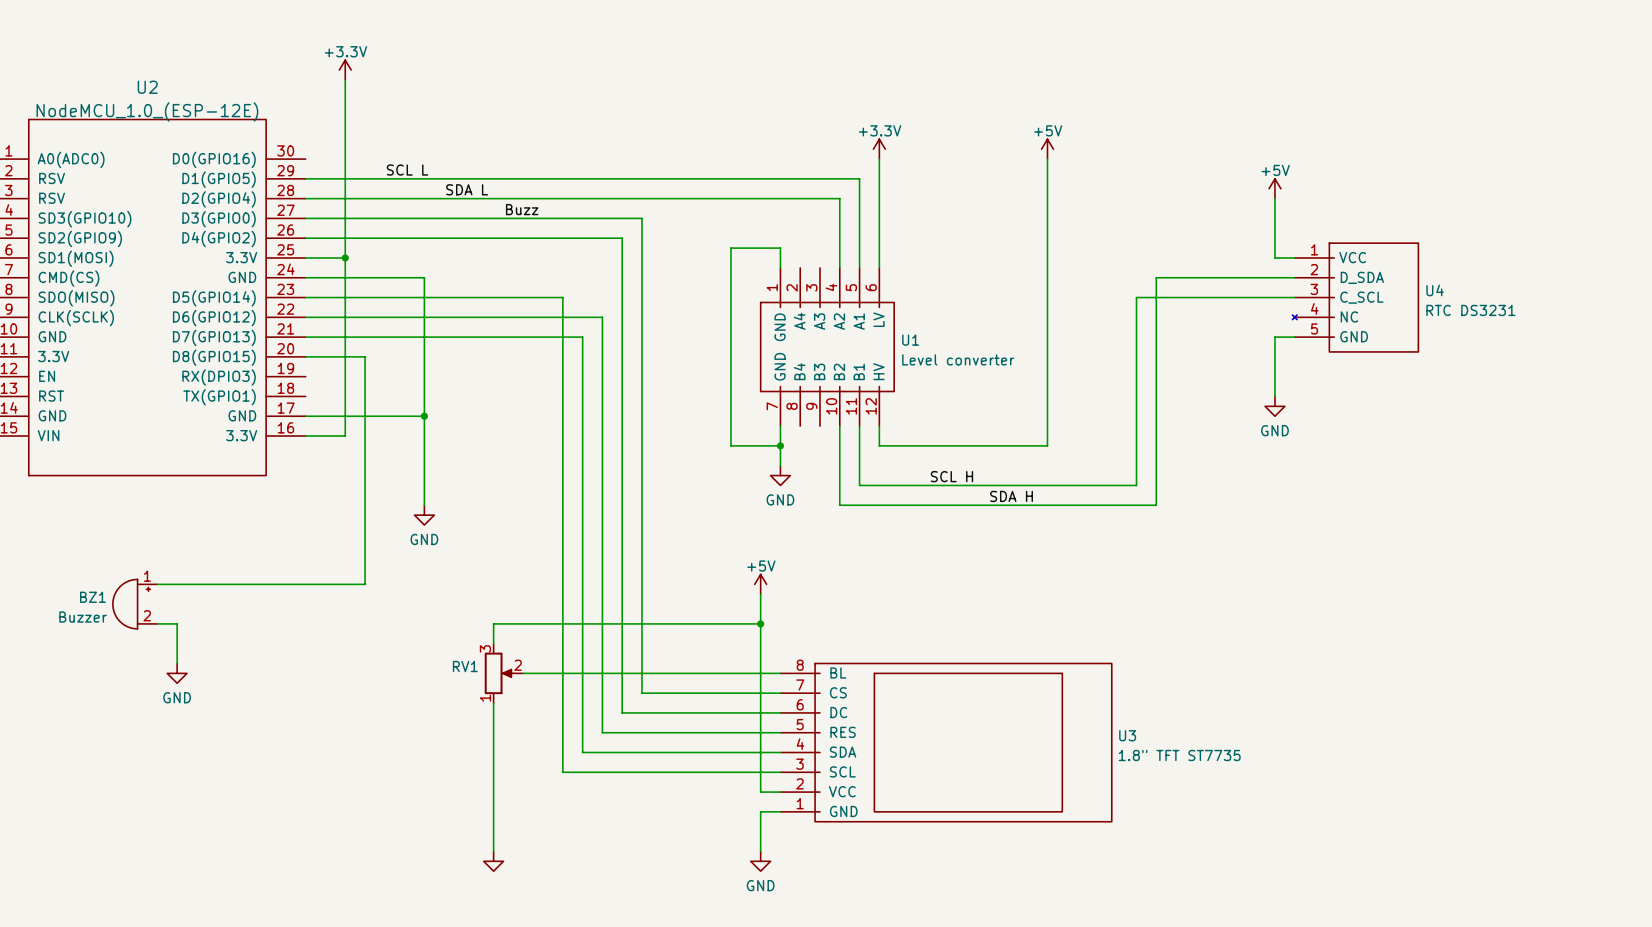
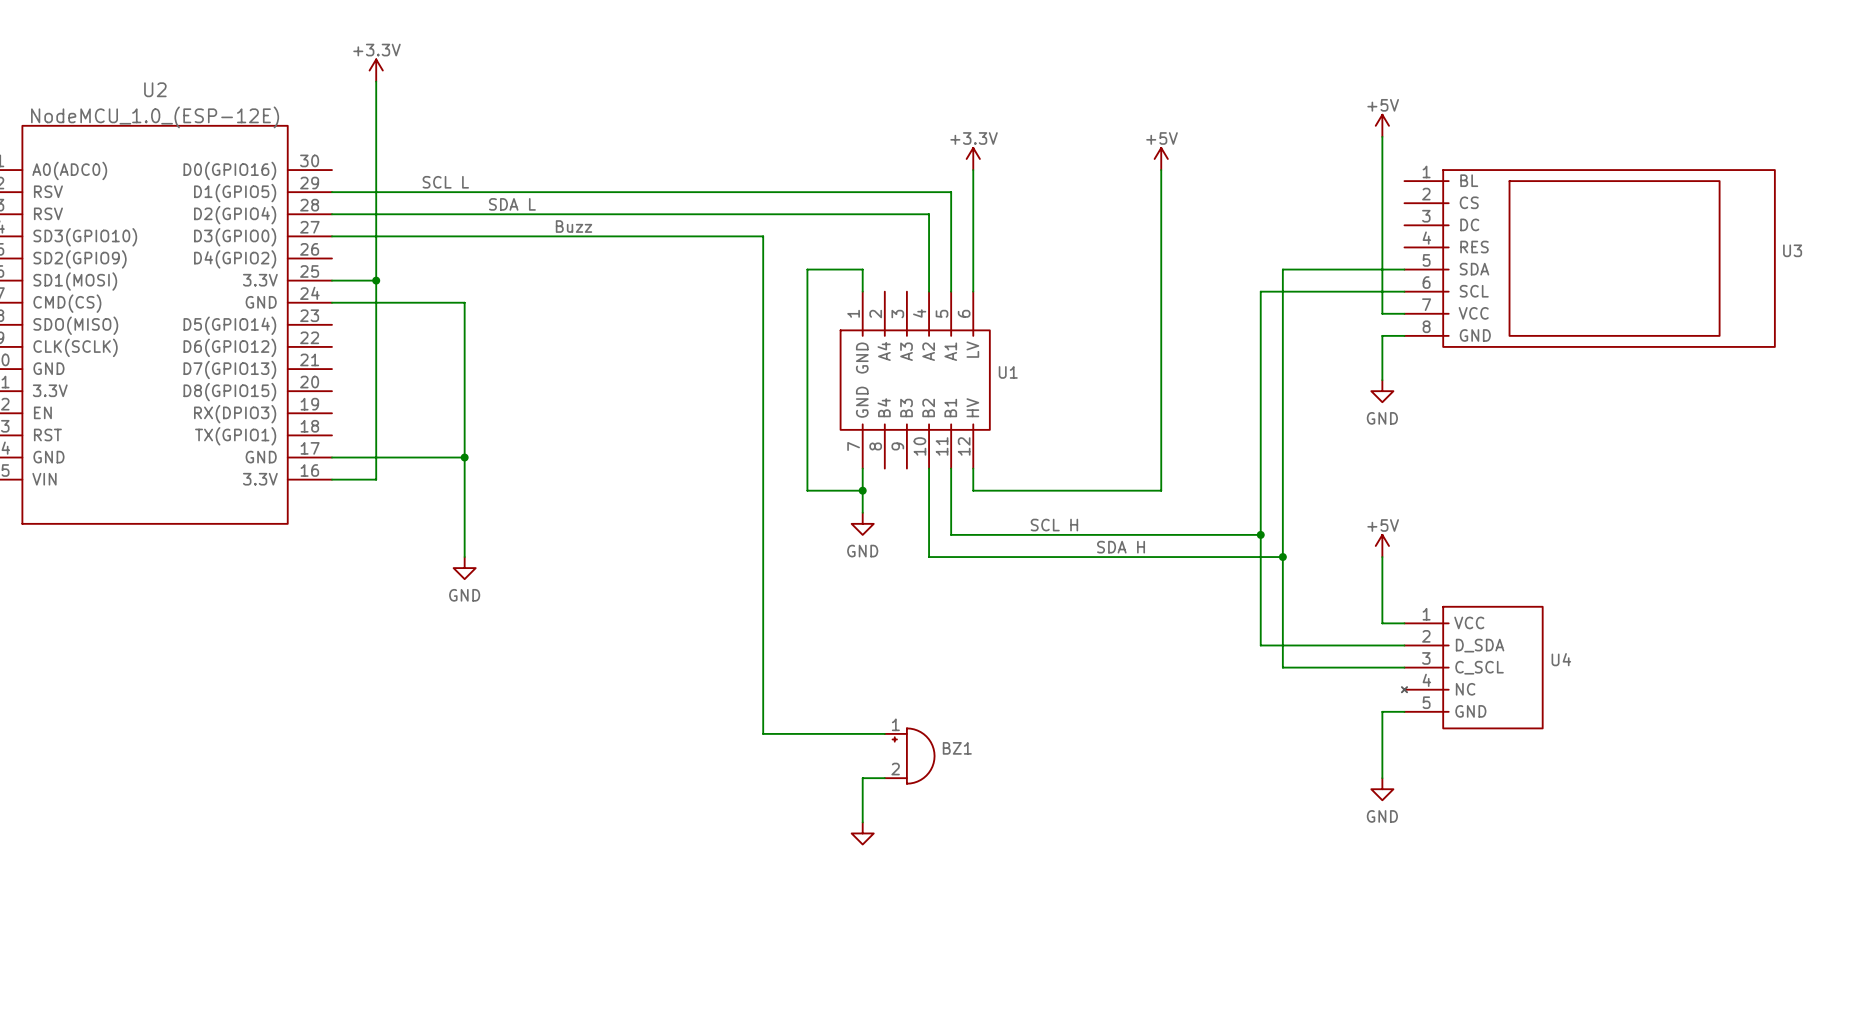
wire: none -> (1382, 136) (1382, 313) (1404, 313)
power symbol position: +5V (1274, 188) -> +5V (1382, 125)
wire: (1274, 198) (1274, 257) (1294, 257) -> none
wire: (641, 218) (641, 693) (780, 693) -> (707, 236) (763, 236) (763, 733) (884, 733)
wire: (305, 238) (622, 238) (622, 712) (780, 712) -> none
wire: (1156, 277) (1294, 277) -> (1282, 302) (1282, 269) (1404, 269)
wire: (305, 297) (562, 297) (562, 772) (780, 772) -> none
wire: (1136, 297) (1294, 297) -> (1260, 324) (1260, 291) (1404, 291)
U4 position: (1355, 297) -> (1472, 667)
wire: none -> (1404, 335) (1382, 335) (1382, 380)
U4 value: RTC DS3231 (1470, 310) -> none
wire: (305, 317) (602, 317) (602, 732) (780, 732) -> none
wire: (305, 337) (582, 337) (582, 752) (780, 752) -> none
wire: (1294, 337) (1274, 337) (1274, 396) -> none
wire: (305, 356) (365, 356) (365, 584) (157, 584) -> none
U1 value: Level converter (958, 359) -> none
power symbol position: GND (1274, 406) -> GND (1382, 391)
wire: none -> (1260, 534) (1260, 645) (1404, 645)
junction: none -> (1260, 534)
power symbol: none -> +5V (1382, 545)
wire: none -> (1282, 557) (1282, 667) (1404, 667)
junction: none -> (1282, 557)
wire: none -> (1382, 557) (1382, 623) (1404, 623)
power symbol: +5V (760, 584) -> none
wire: (760, 594) (760, 792) (780, 792) -> none
BZ1 flip: as is (131, 604) -> left-right (913, 756)
BZ1 position: (135, 604) -> (909, 756)
BZ1 value: Buzzer (83, 617) -> none
wire: (157, 623) (177, 623) (177, 663) -> none
wire: (760, 623) (493, 623) (493, 643) -> none
junction: (760, 623) -> none
wire: none -> (1404, 711) (1382, 711) (1382, 778)
U3 pin number: 8 (800, 665) -> 1 (1426, 171)
power symbol: GND (177, 673) -> none
RV1: (504, 673) -> none
wire: (523, 673) (780, 673) -> none
U3 pin number: 7 (800, 685) -> 2 (1426, 194)
wire: (493, 703) (493, 851) -> none
U3 pin number: 6 (800, 704) -> 3 (1426, 216)
power symbol: none -> GND (1382, 789)
U3 pin number: 5 (800, 724) -> 4 (1426, 238)
U3 position: (946, 742) -> (1589, 258)
U3 pin number: 4 (800, 744) -> 5 (1426, 260)
power symbol: none -> (862, 833)
U3 value: 1.8" TFT ST7735 (1179, 755) -> none
U3 pin number: 3 (799, 764) -> 6 (1426, 282)
U3 pin number: 2 (799, 783) -> 7 (1426, 304)
U3 pin number: 1 (800, 803) -> 8 (1426, 326)
wire: (780, 811) (760, 811) (760, 851) -> (884, 778) (862, 778) (862, 822)
power symbol: (493, 861) -> none
power symbol: GND (760, 861) -> none

